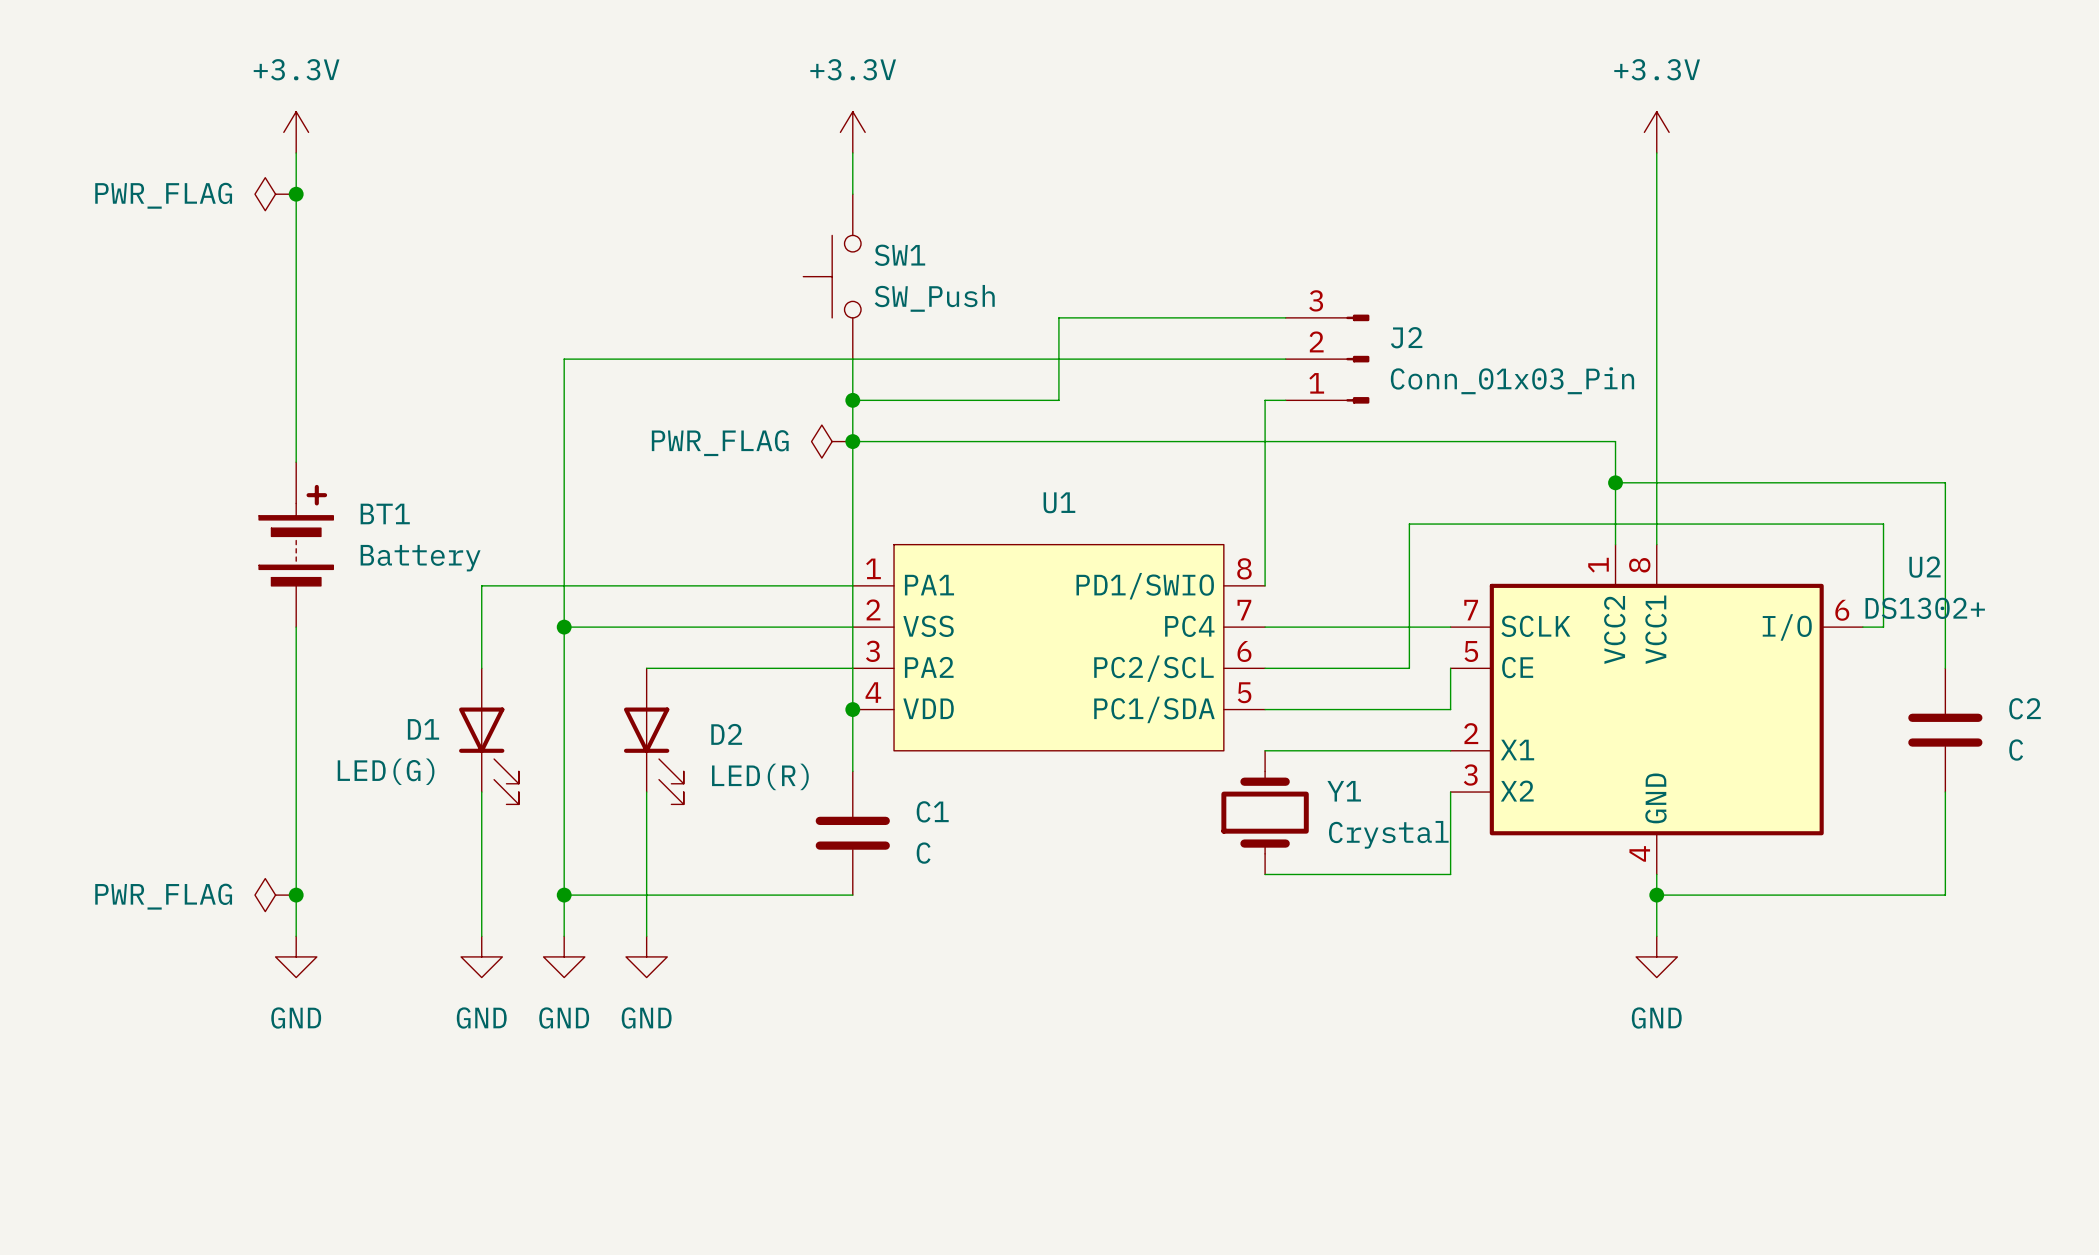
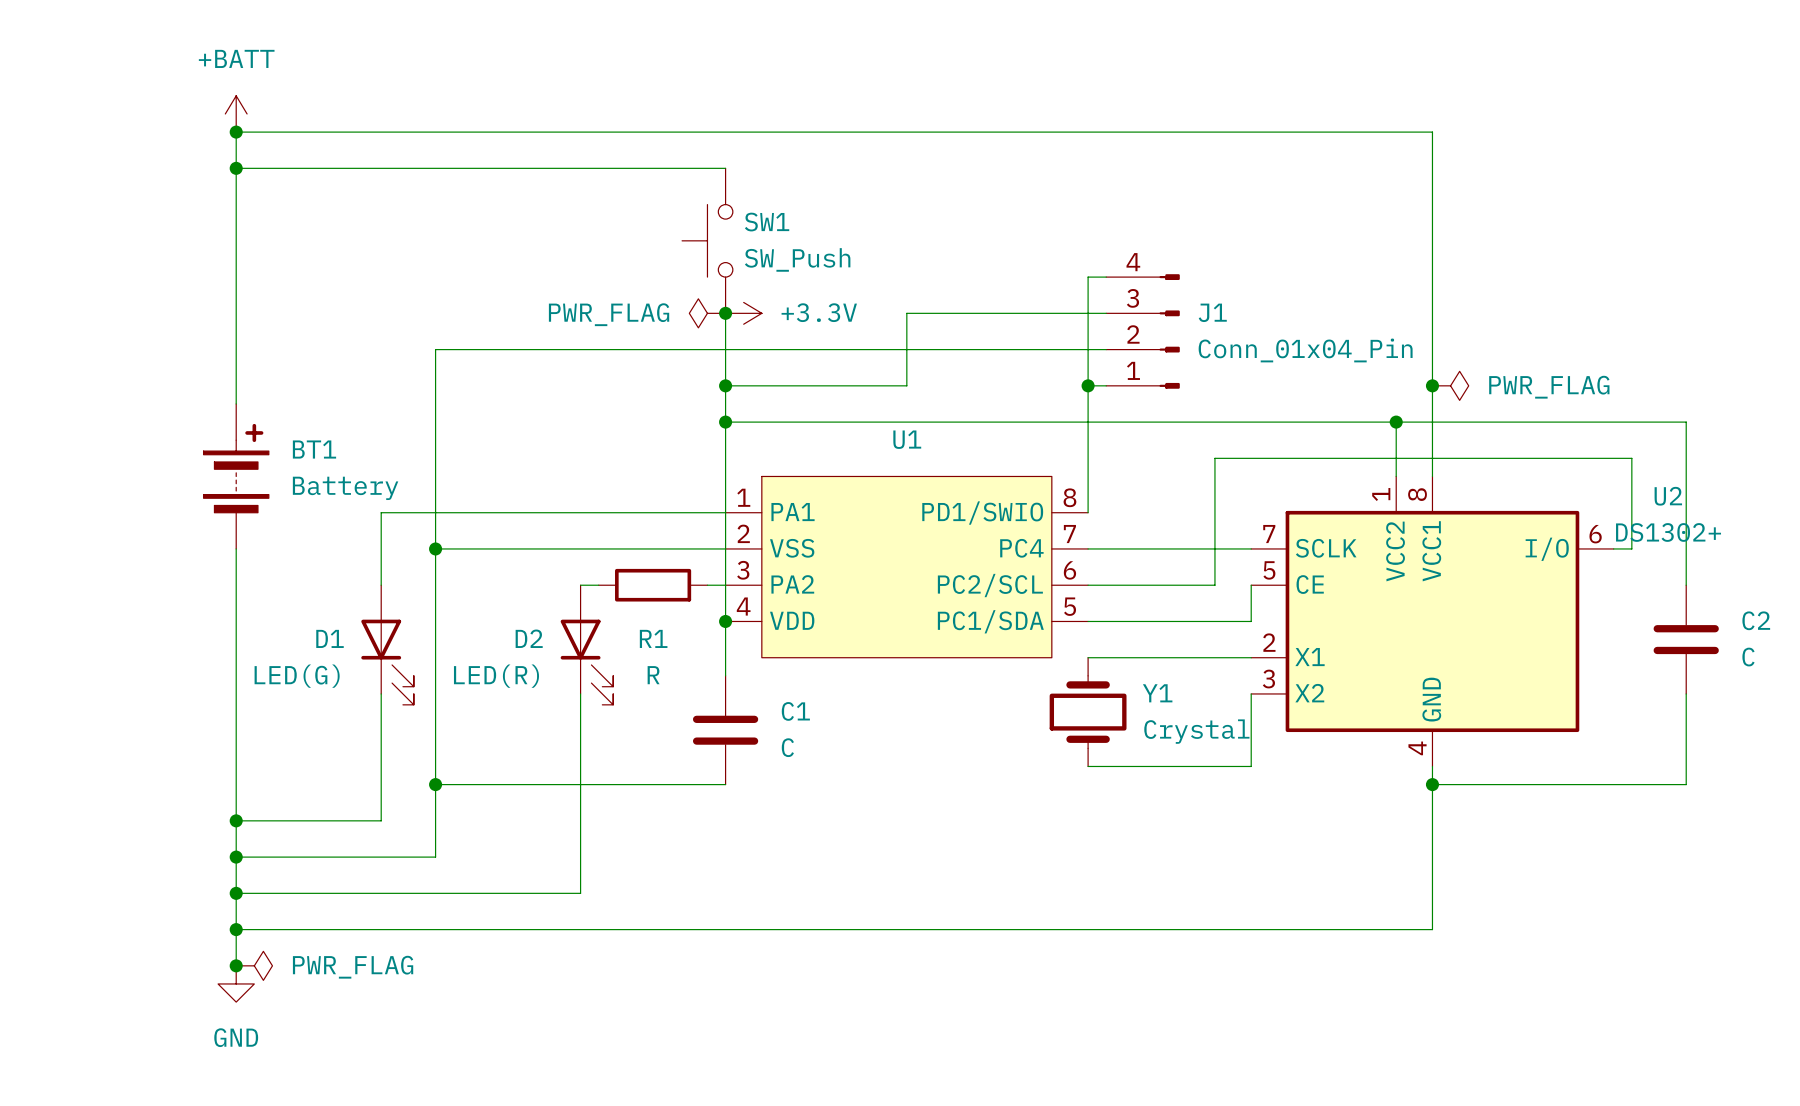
power symbol text position: +3.3V (853, 69) -> +3.3V (819, 312)
power symbol: +3.3V (296, 132) -> +BATT (236, 113)
power symbol rotation: 0° (852, 132) -> 90° clockwise (743, 313)
power symbol position: +3.3V (852, 132) -> +3.3V (743, 313)
power symbol: +3.3V (1656, 132) -> none
wire: none -> (236, 132) (1432, 132)
junction: none -> (236, 132)
wire: (852, 152) (852, 194) -> (236, 168) (725, 168)
power symbol: PWR_FLAG (275, 194) -> none
wire: (1265, 317) (1058, 317) (1058, 359) (564, 359) (564, 936) -> none
junction: none -> (725, 313)
J2: Conn_01x03_Pin (1327, 359) -> none
J1: none -> Conn_01x04_Pin (1143, 331)
wire: none -> (725, 349) (435, 349) (435, 857) (236, 857)
junction: (852, 400) -> none
power symbol position: PWR_FLAG (832, 441) -> PWR_FLAG (707, 313)
wire: (1058, 441) (1265, 441) -> (906, 385) (906, 349) (1088, 349) (1088, 277)
junction: none -> (1088, 385)
wire: (1285, 441) (1615, 441) (1615, 482) -> (725, 422) (1396, 422)
junction: none -> (1432, 385)
power symbol: none -> PWR_FLAG (1450, 385)
junction: none -> (725, 422)
wire: (481, 585) (481, 668) -> (399, 512) (381, 512) (381, 585)
junction position: (564, 627) -> (435, 548)
wire: (646, 668) (687, 668) -> (435, 548) (471, 548)
wire: (708, 668) (832, 668) -> none
R1: none -> R (653, 585)
D2 name position: D2 (726, 734) -> D2 (529, 638)
D1 position: (488, 736) -> (387, 645)
D2 position: (653, 736) -> (586, 645)
D2 value position: LED(R) (760, 776) -> LED(R) (496, 676)
wire: none -> (381, 693) (381, 820) (236, 820) (236, 965)
wire: (481, 792) (481, 936) -> none
wire: (646, 792) (646, 936) -> none
wire: none -> (580, 693) (580, 893) (236, 893)
power symbol rotation: 0° (275, 895) -> 180° (254, 965)
power symbol position: PWR_FLAG (275, 895) -> PWR_FLAG (254, 965)
junction: (296, 895) -> none
wire: none -> (435, 784) (471, 784)
junction position: (564, 895) -> (435, 784)
junction: none -> (236, 820)
wire: none -> (1432, 820) (1432, 929) (236, 929)
power symbol: GND (296, 956) -> none
power symbol: GND (481, 956) -> none
power symbol: GND (564, 956) -> none
power symbol: GND (646, 956) -> none
power symbol: GND (1656, 956) -> none
junction: none -> (236, 857)
junction: none -> (236, 893)
junction: none -> (236, 929)
junction: none -> (236, 965)
power symbol: none -> GND (236, 983)

